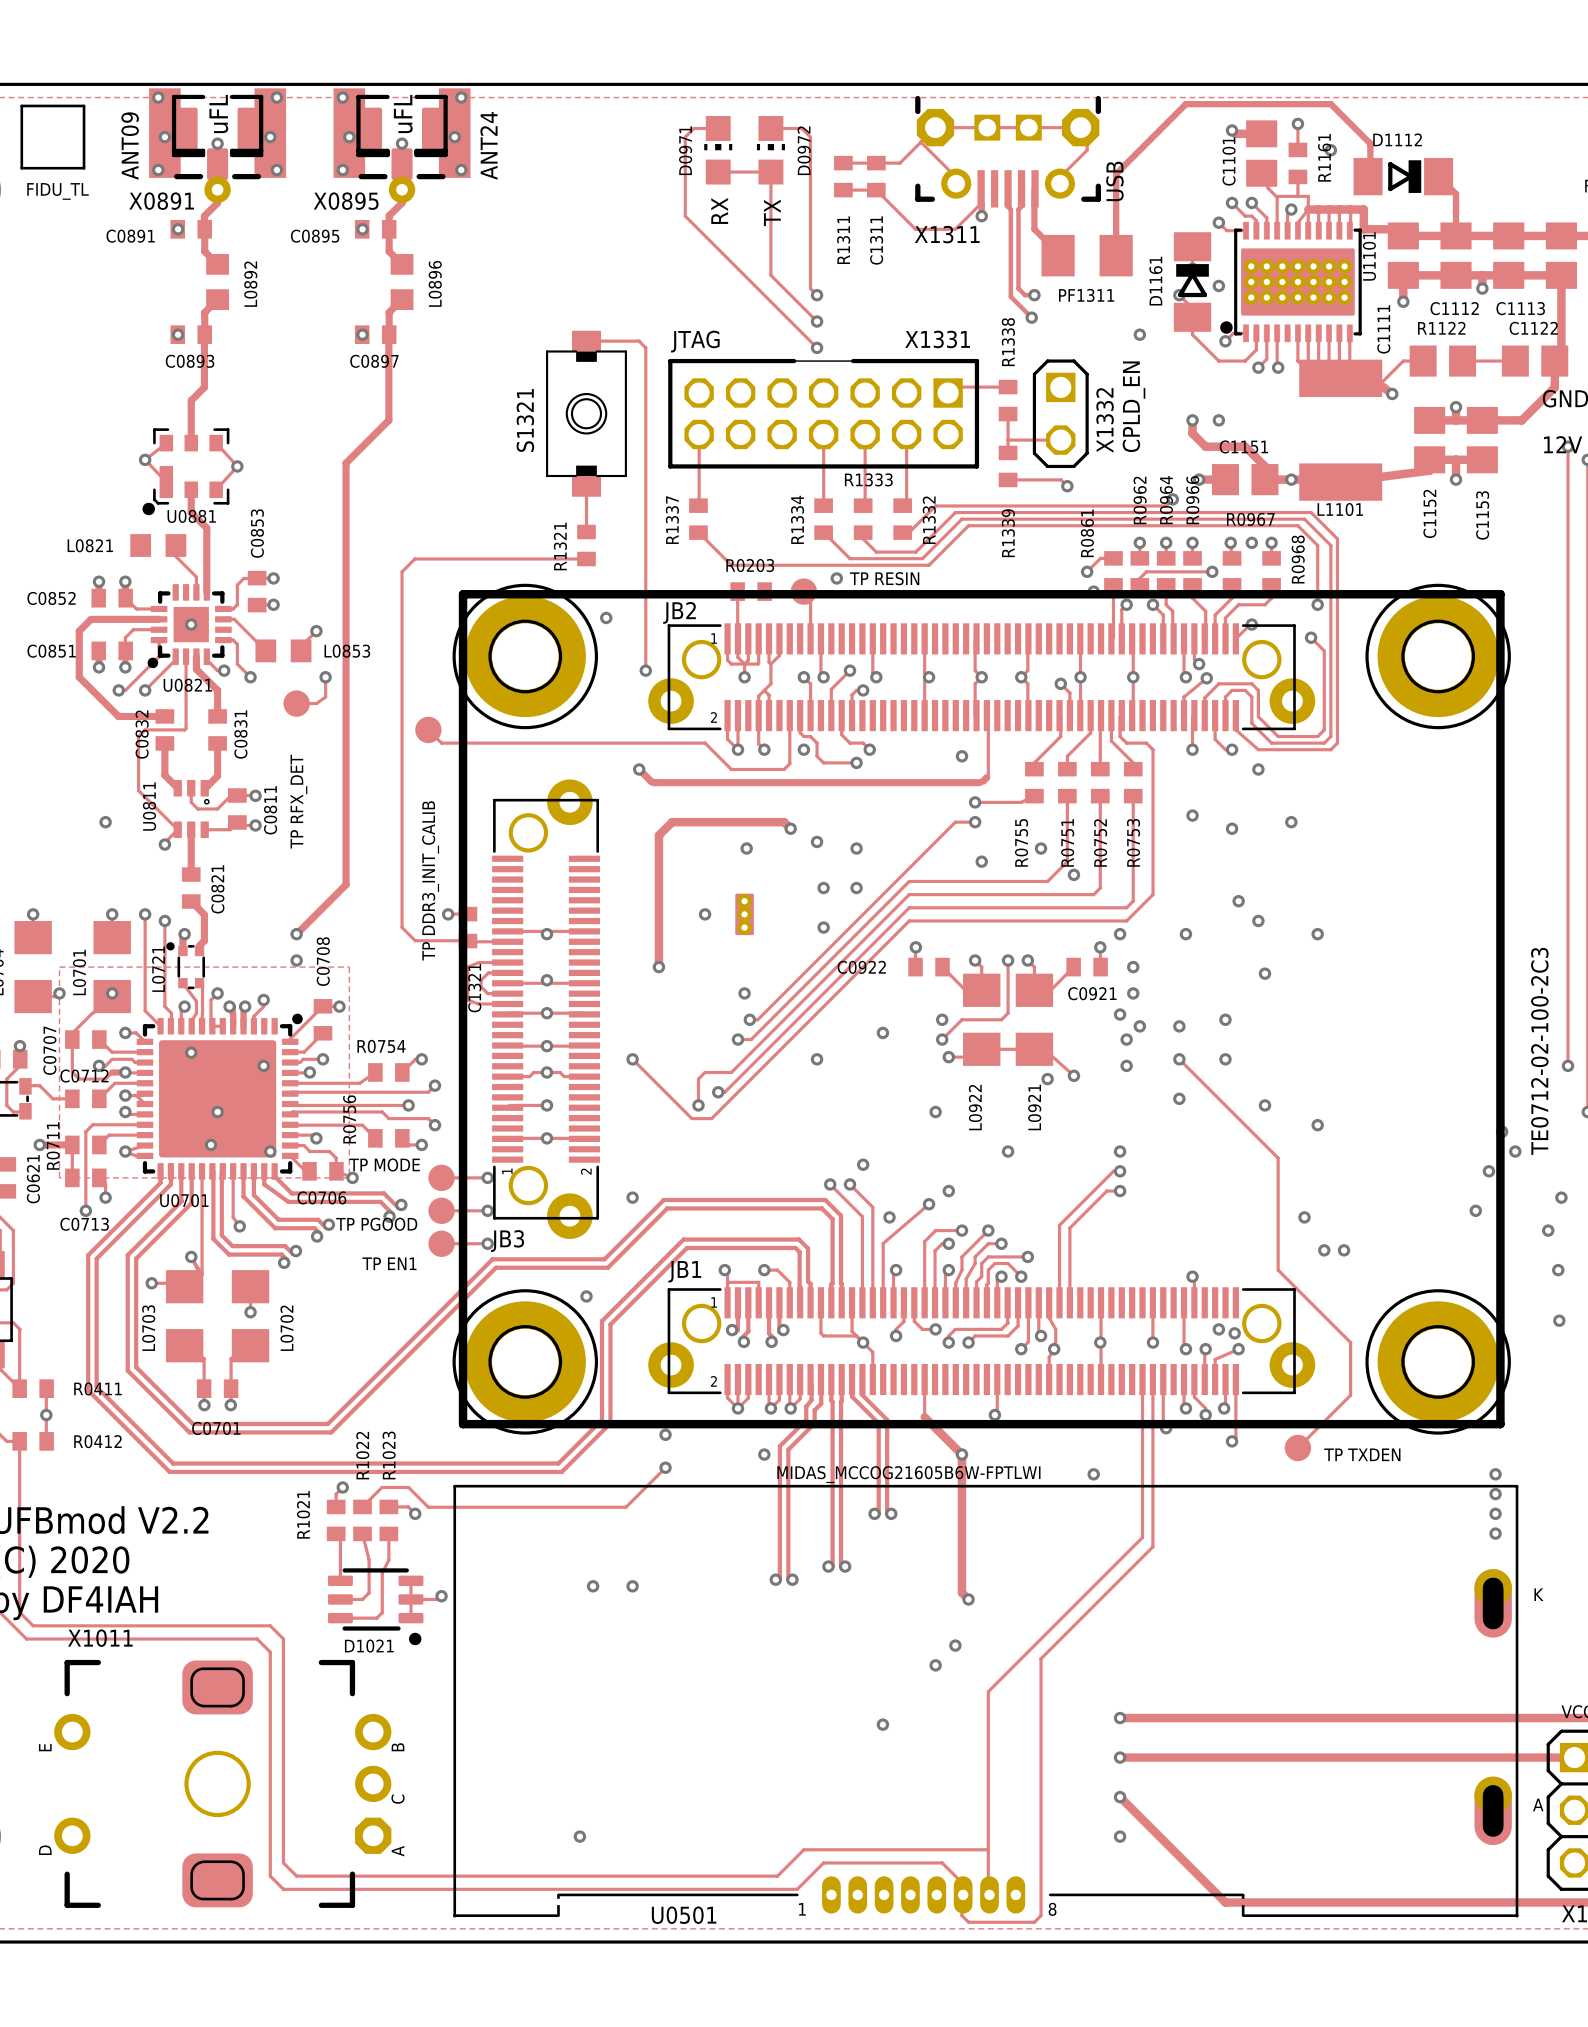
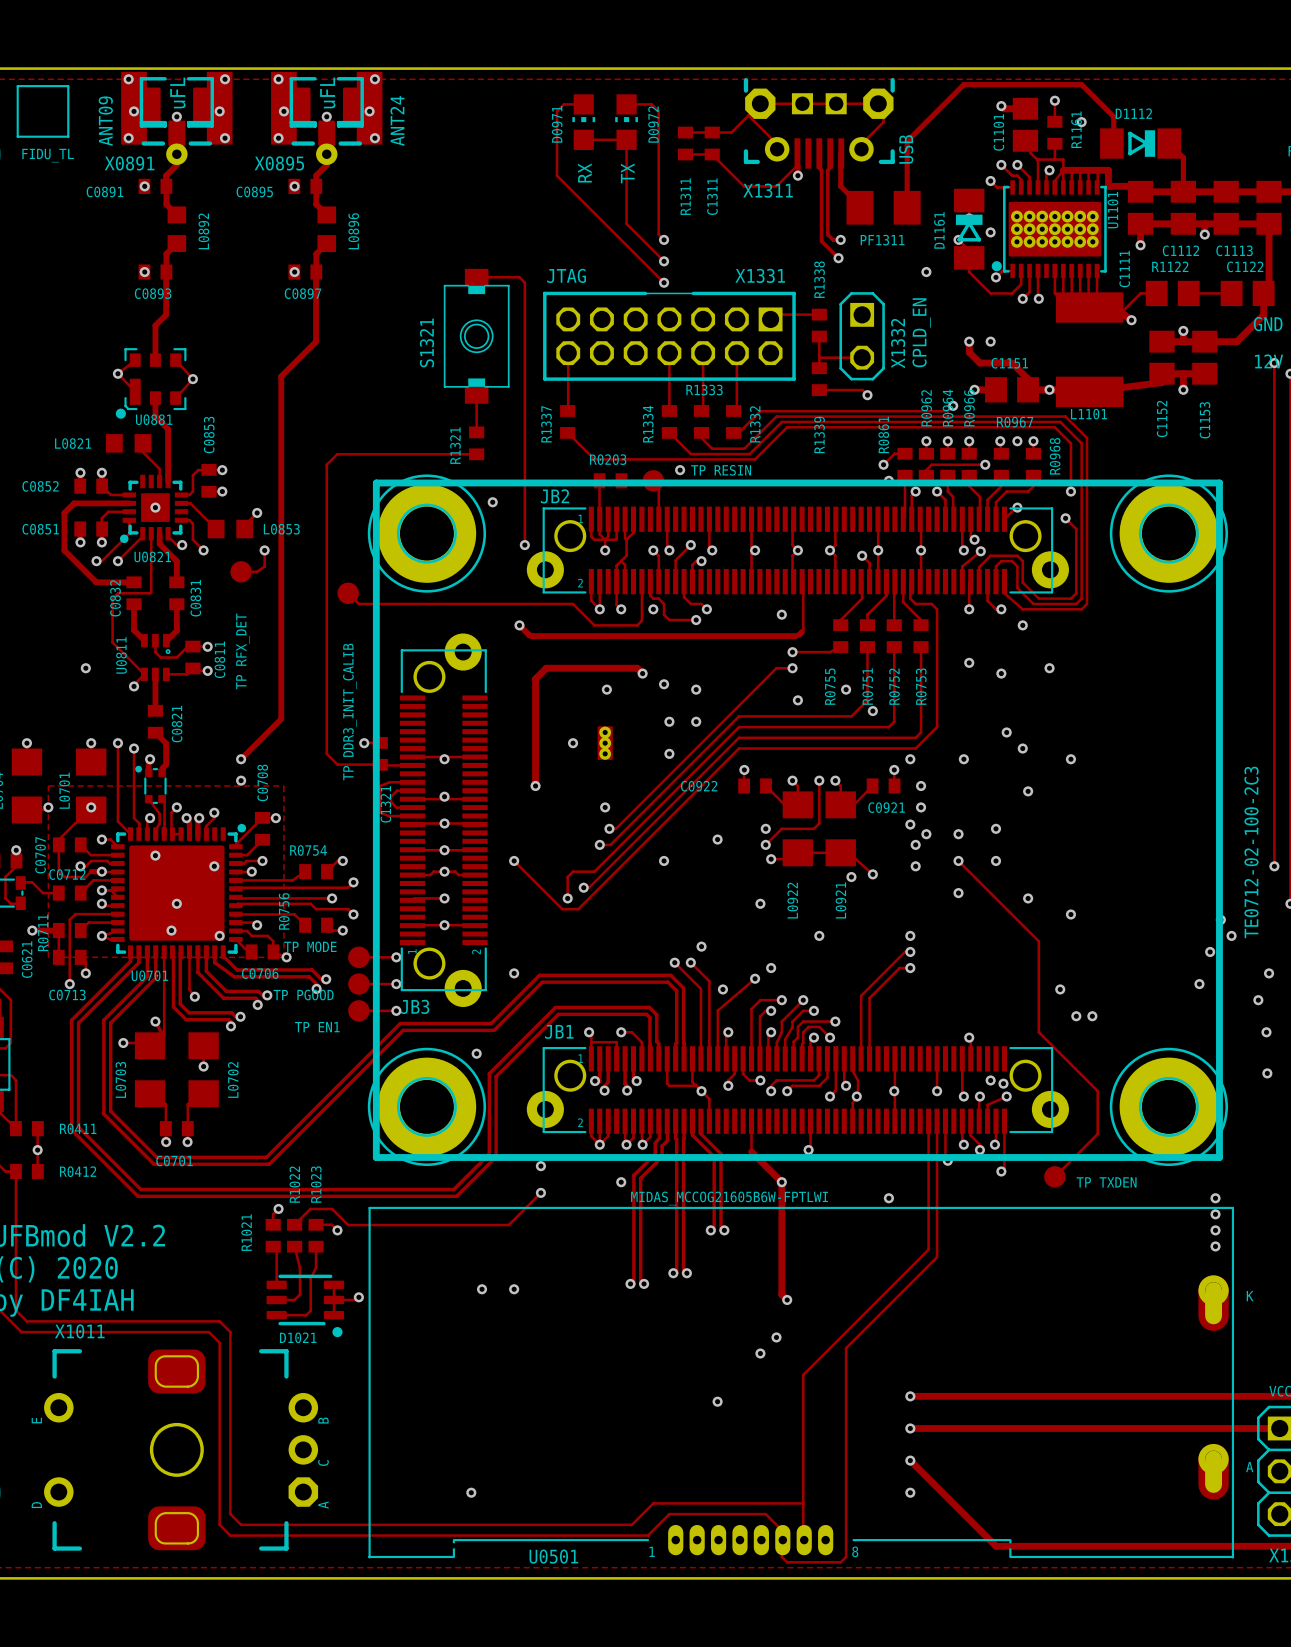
L0721 name: L0721 (158, 969) -> none

